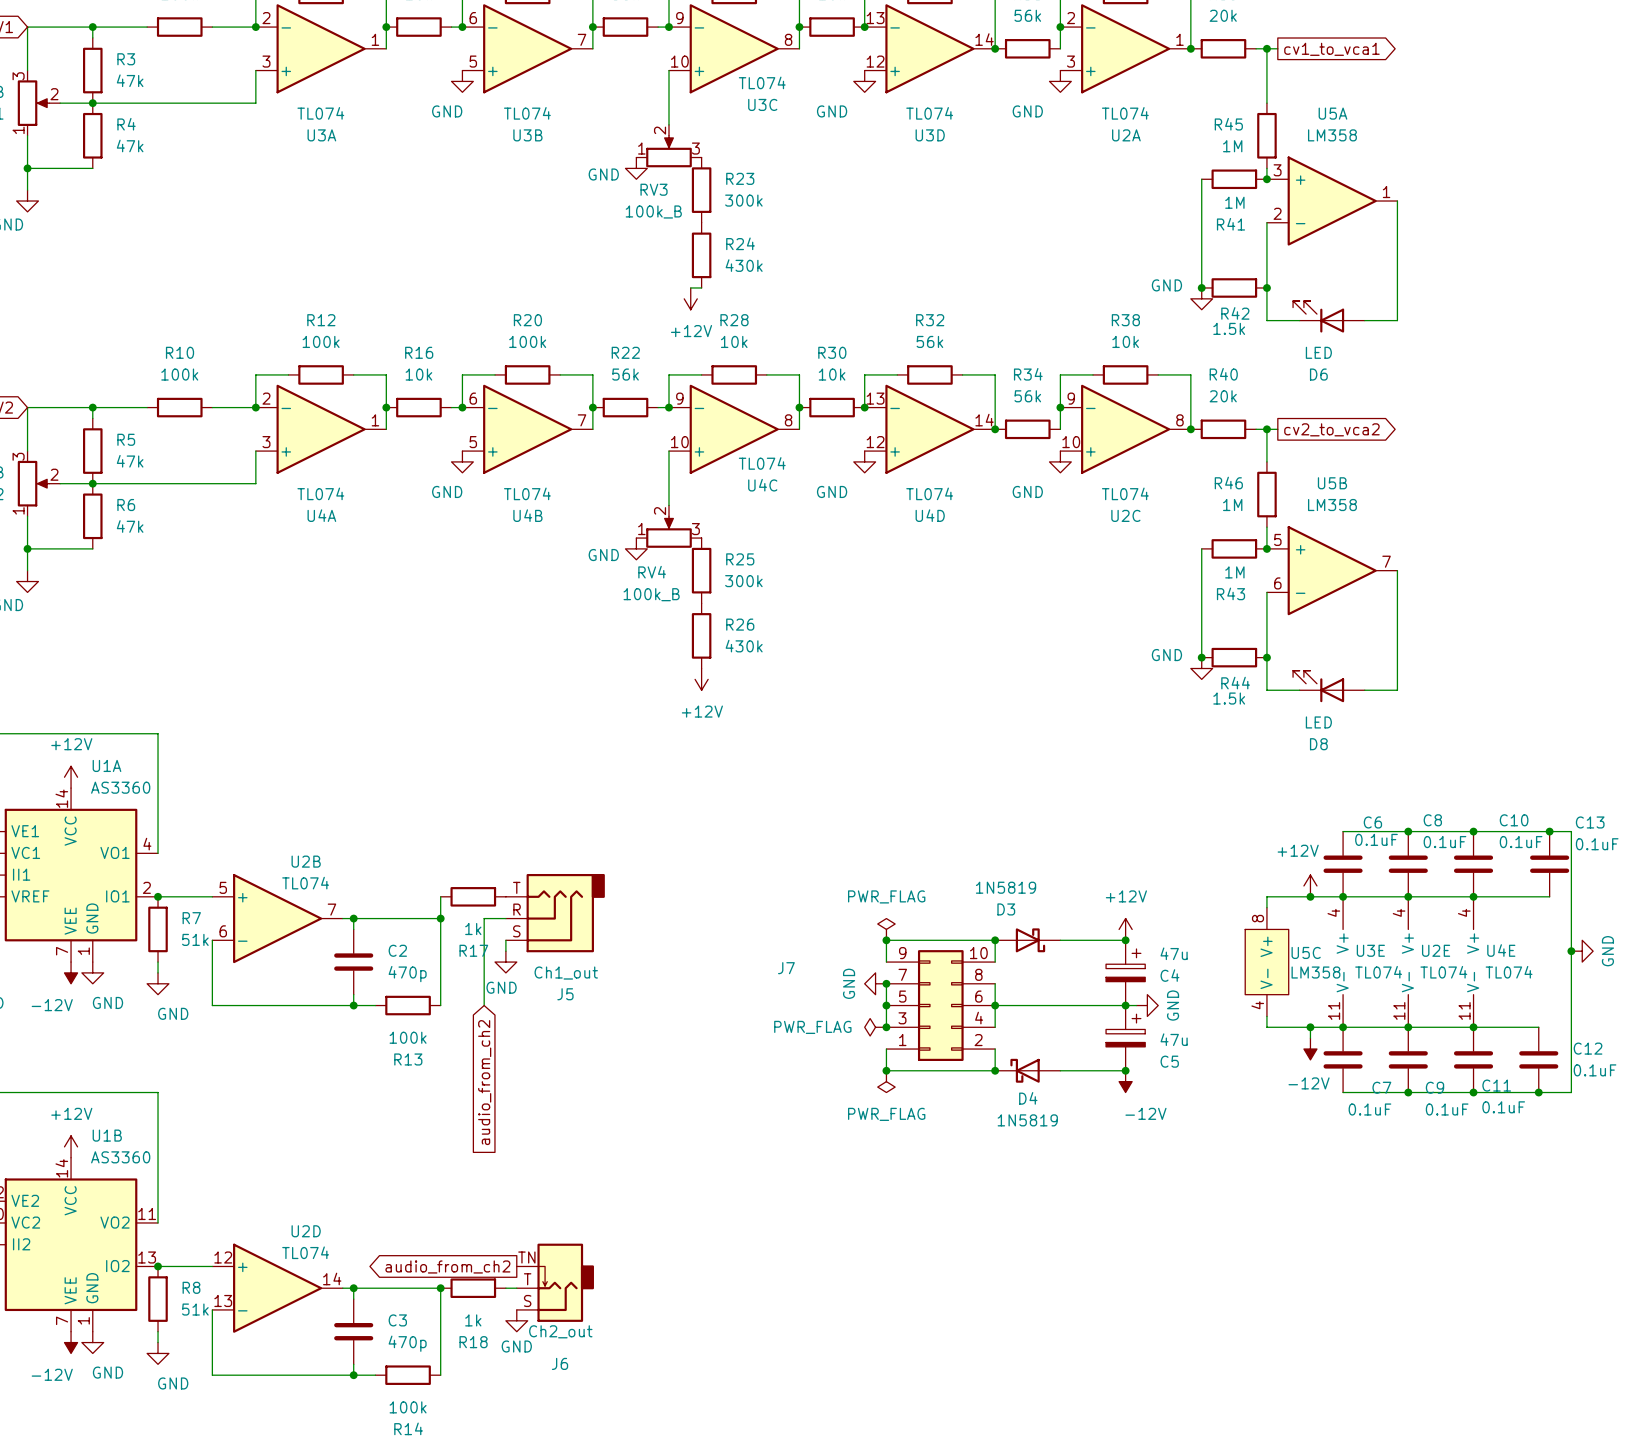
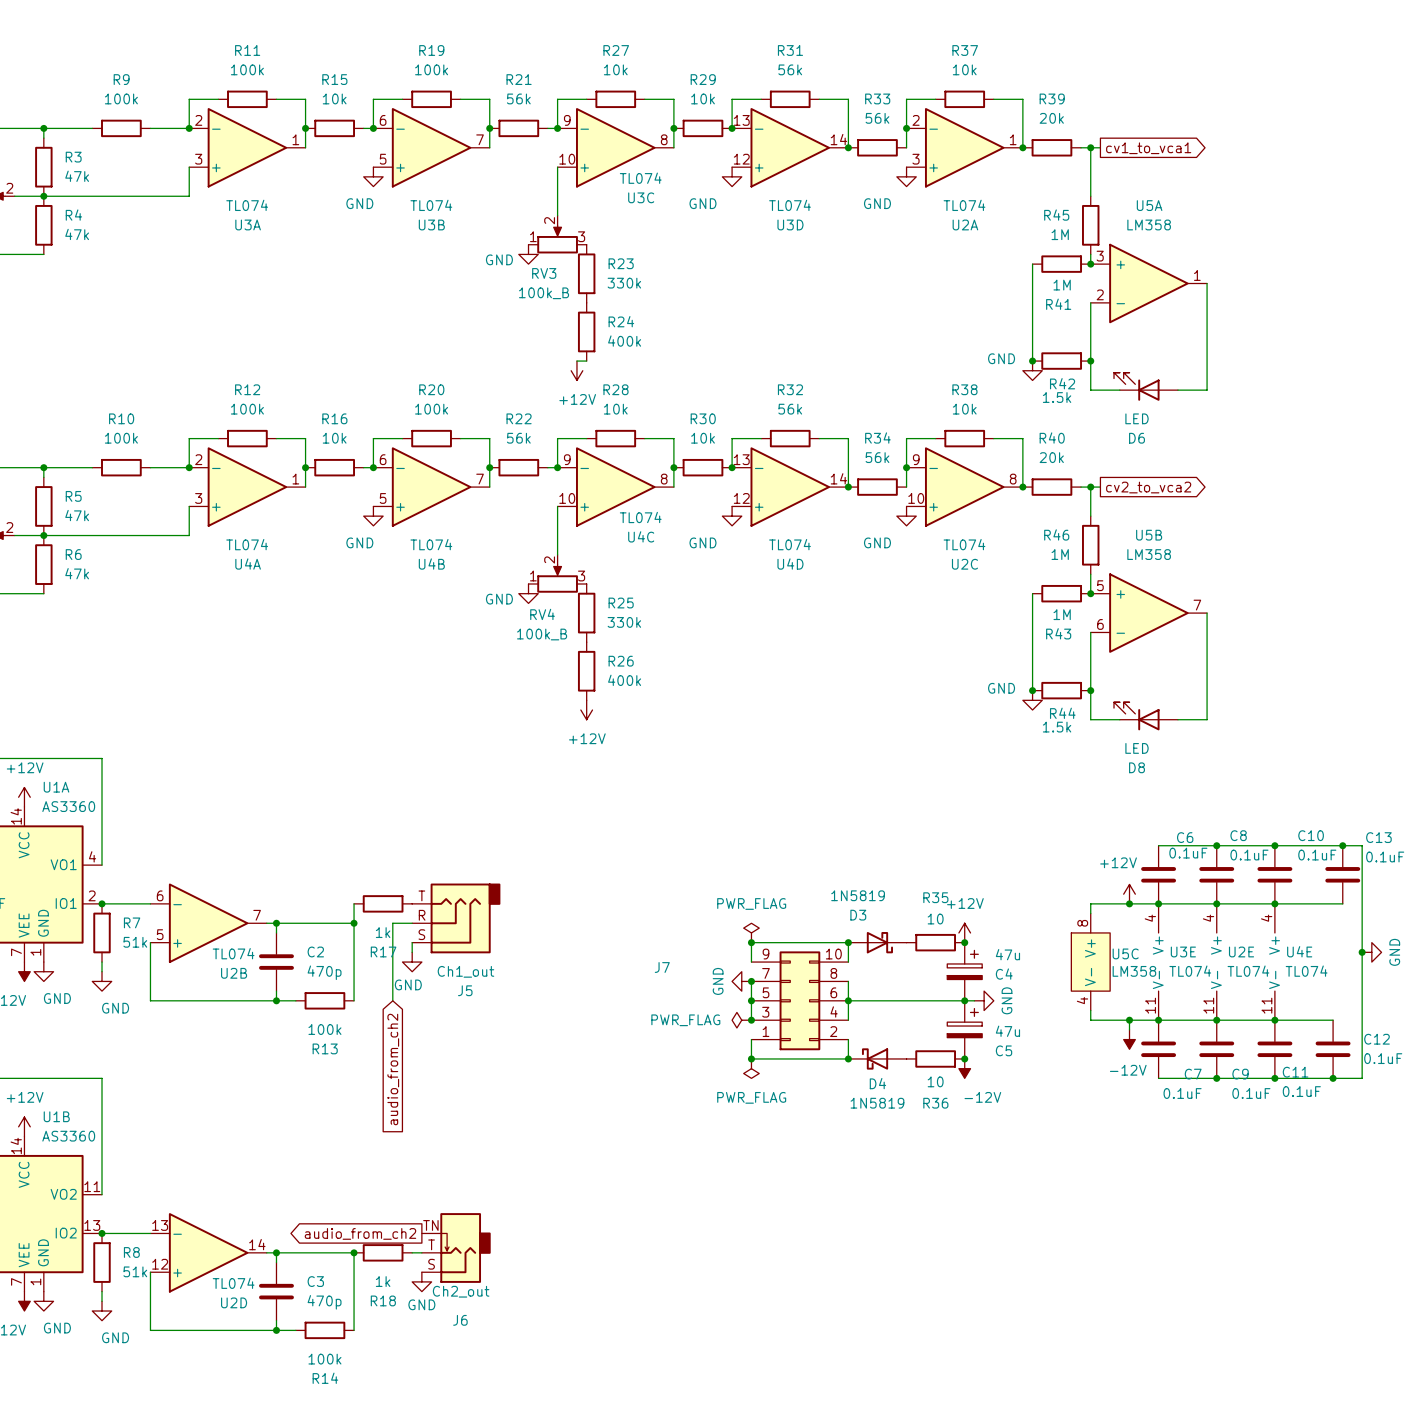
R23 value: 300k (743, 200) -> 330k (624, 283)
R24 value: 430k (744, 265) -> 400k (624, 341)
R25 value: 300k (743, 581) -> 330k (624, 622)
R26 value: 430k (744, 646) -> 400k (624, 680)
U2B flip: as is (277, 918) -> up-down (208, 923)
wire: (1060, 940) (1125, 940) -> none
R35: none -> 10 (935, 942)
wire: (1060, 1070) (1125, 1070) -> none
R36: none -> 10 (935, 1058)
U2D flip: as is (277, 1288) -> up-down (208, 1252)

